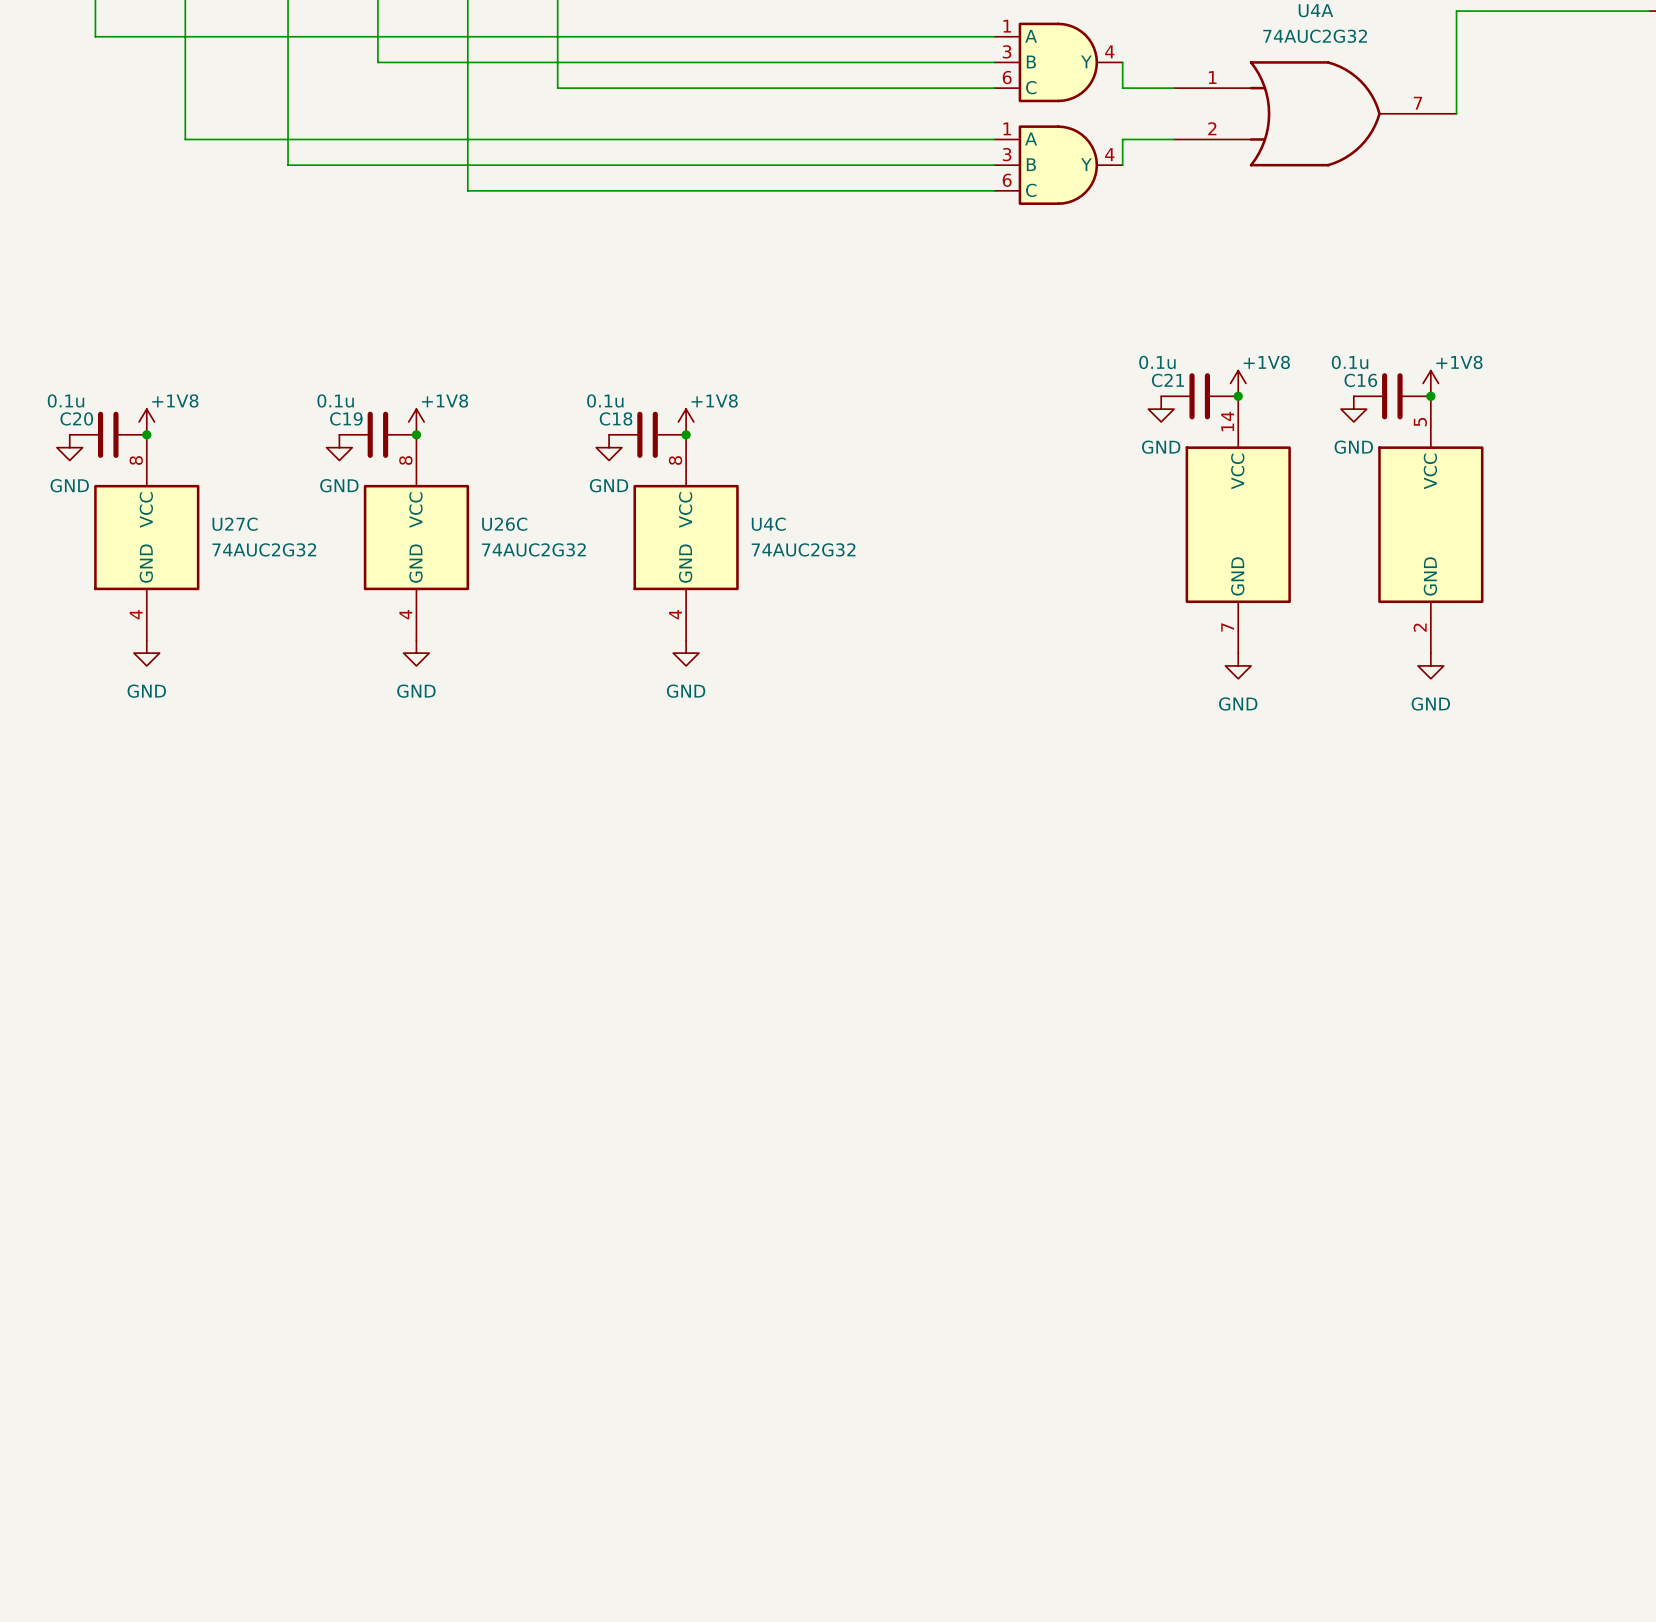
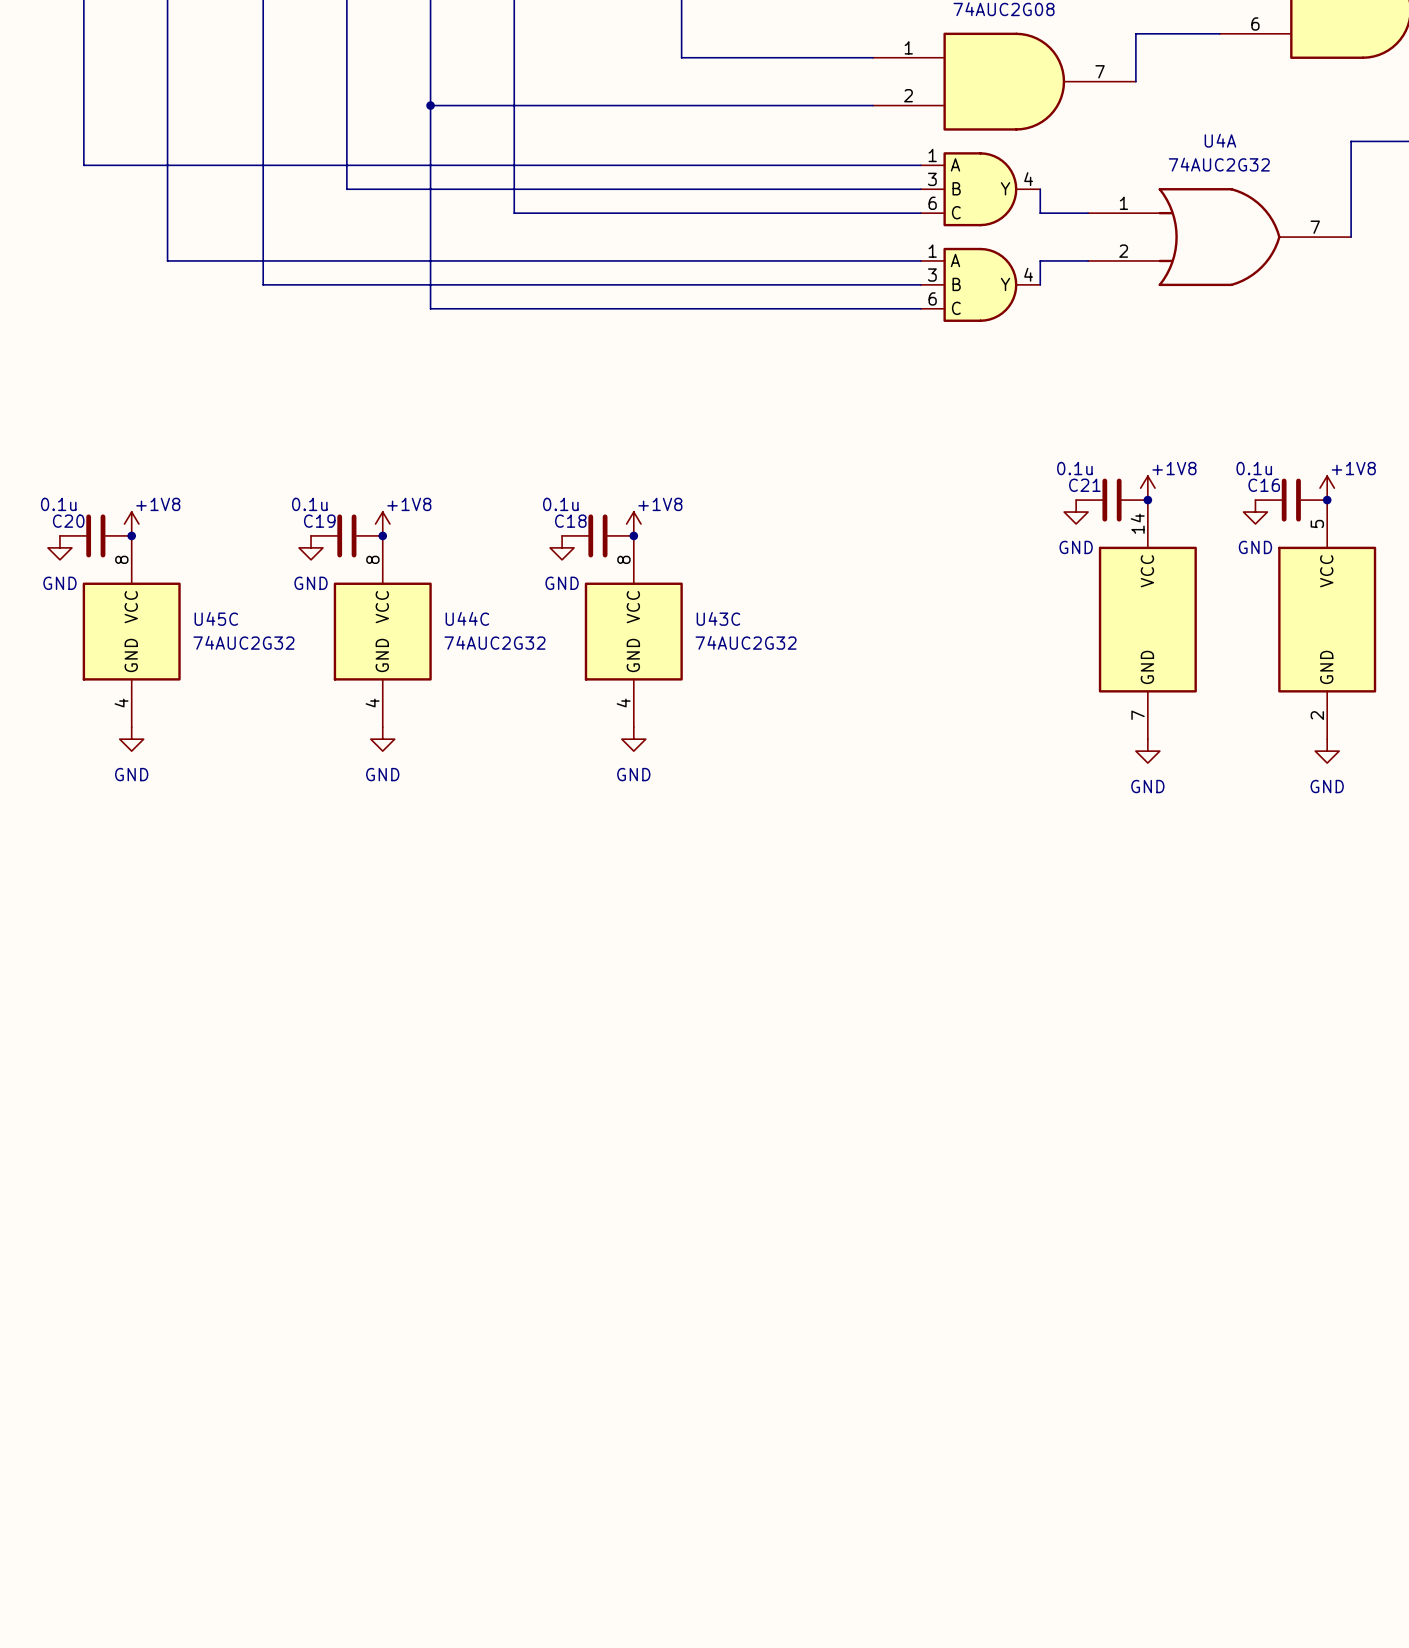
U27C name: U27C (235, 524) -> U45C (216, 618)
U26C name: U26C (504, 524) -> U44C (467, 618)
U4C name: U4C (768, 524) -> U43C (718, 618)

